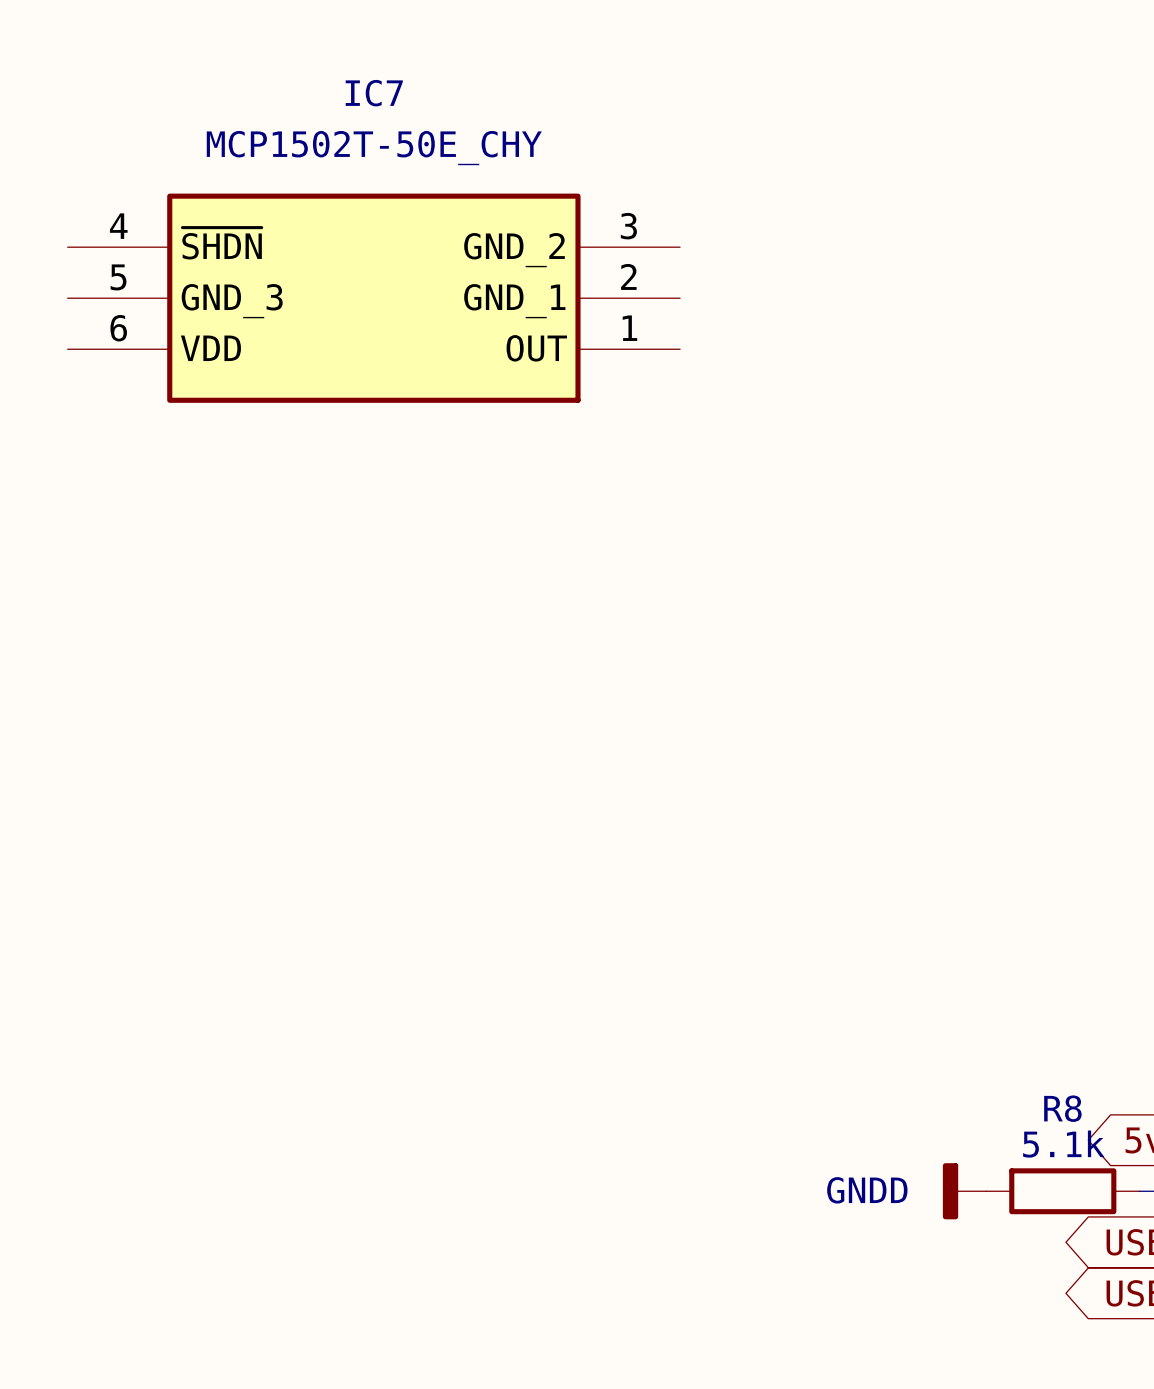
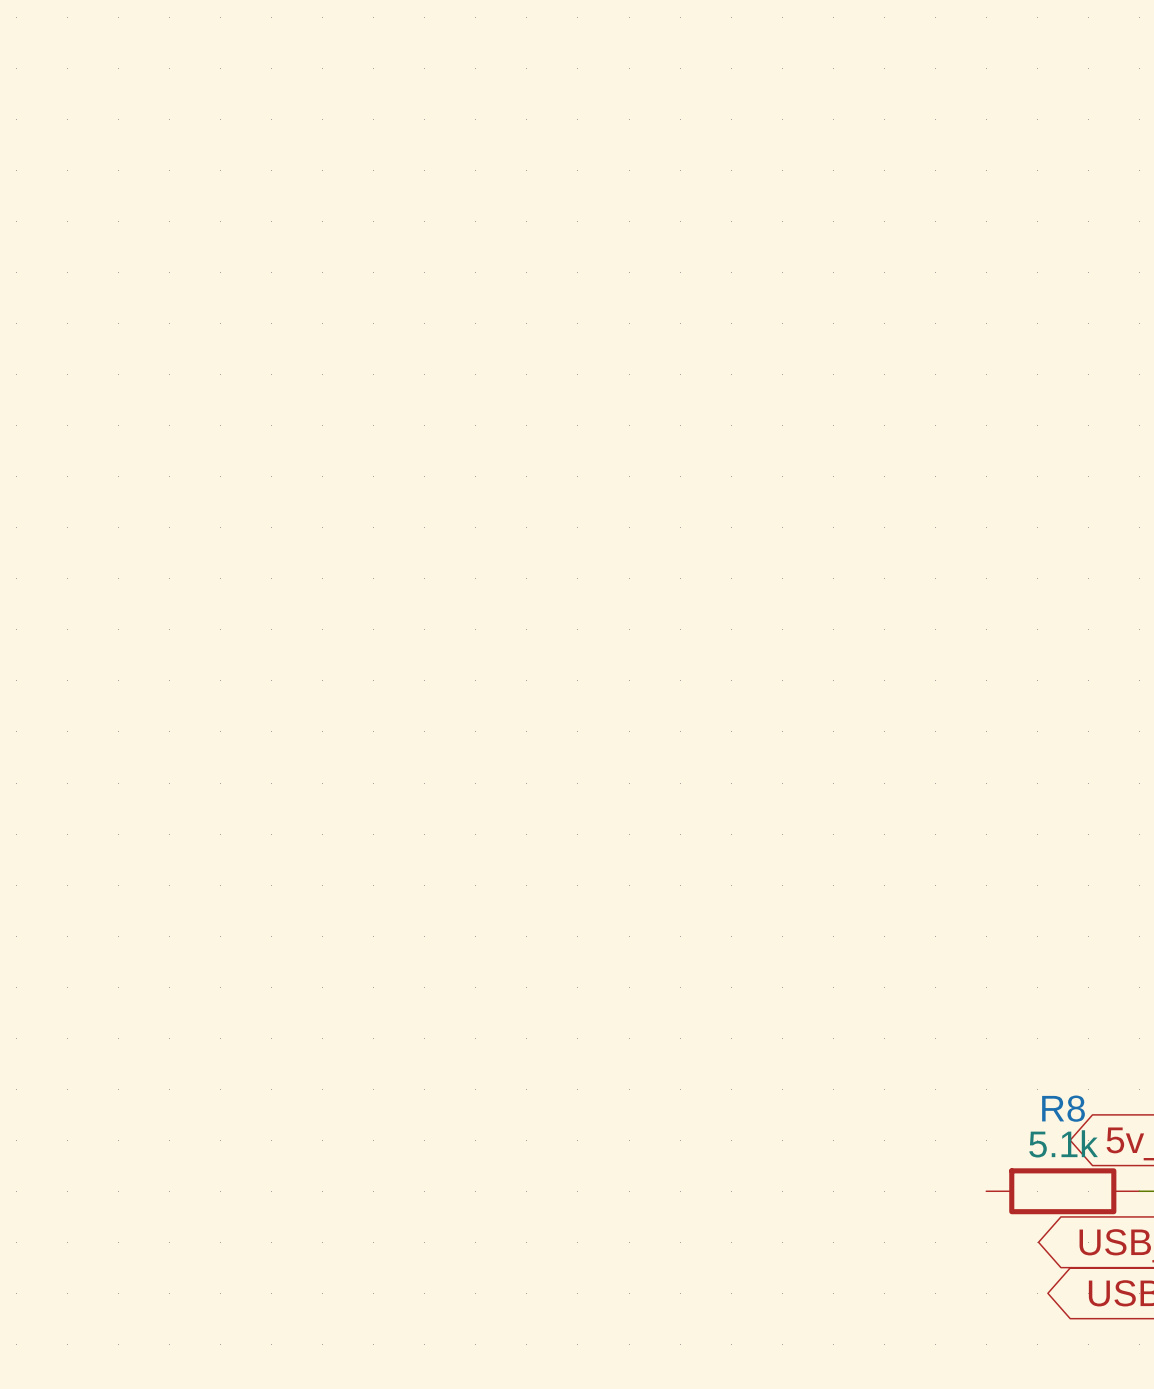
IC7: MCP1502T-50E_CHY (373, 298) -> none
power symbol: GNDD (964, 1191) -> none

